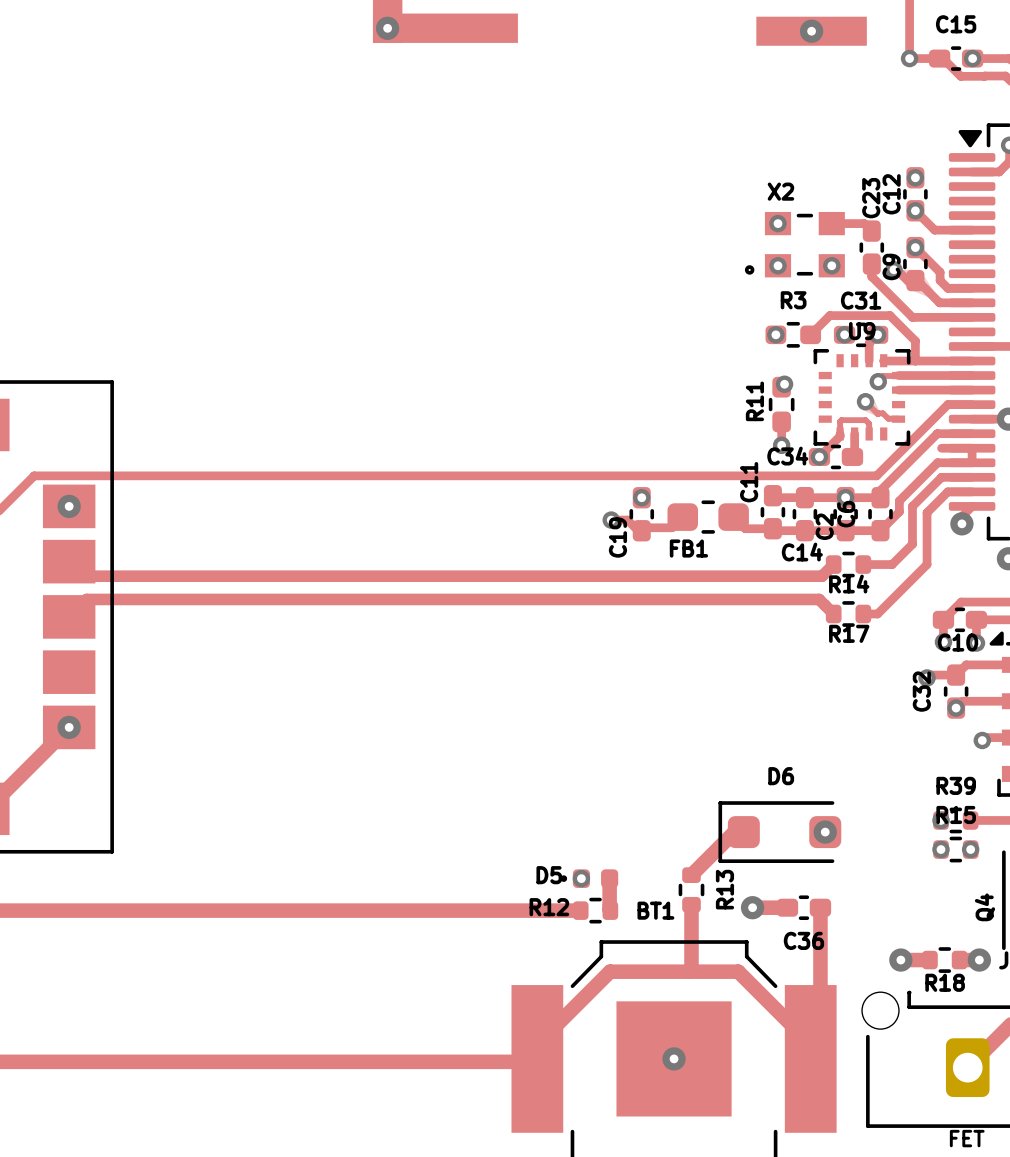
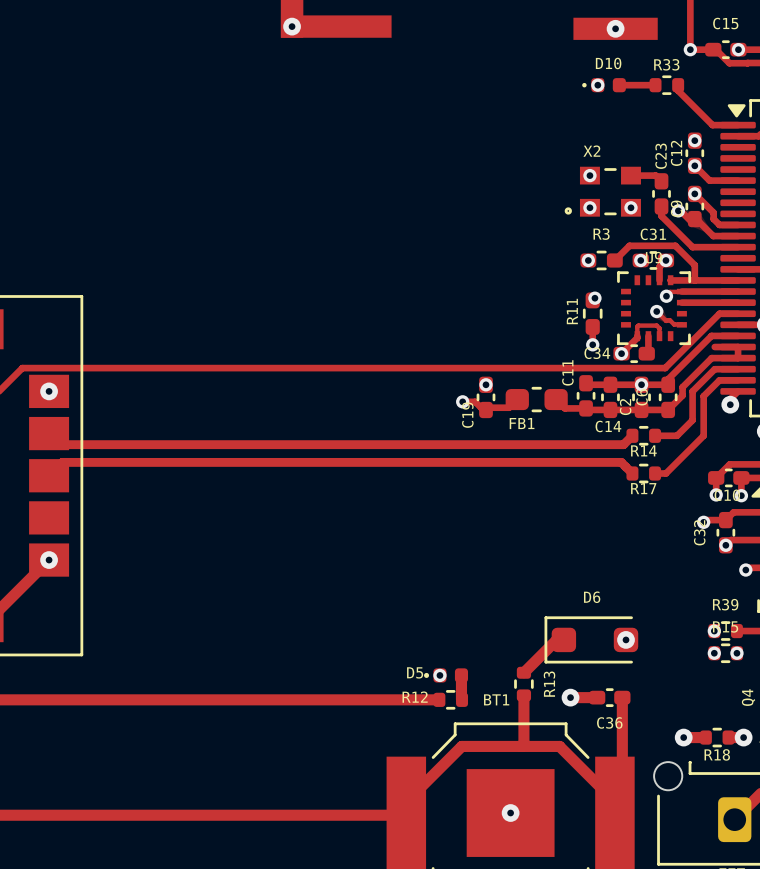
via: none -> (597, 85)
D10: none -> (604, 85)
track: none -> (619, 85) (655, 85)
R33: none -> (666, 85)
track: none -> (678, 85) (678, 90) (712, 125) (738, 125)

